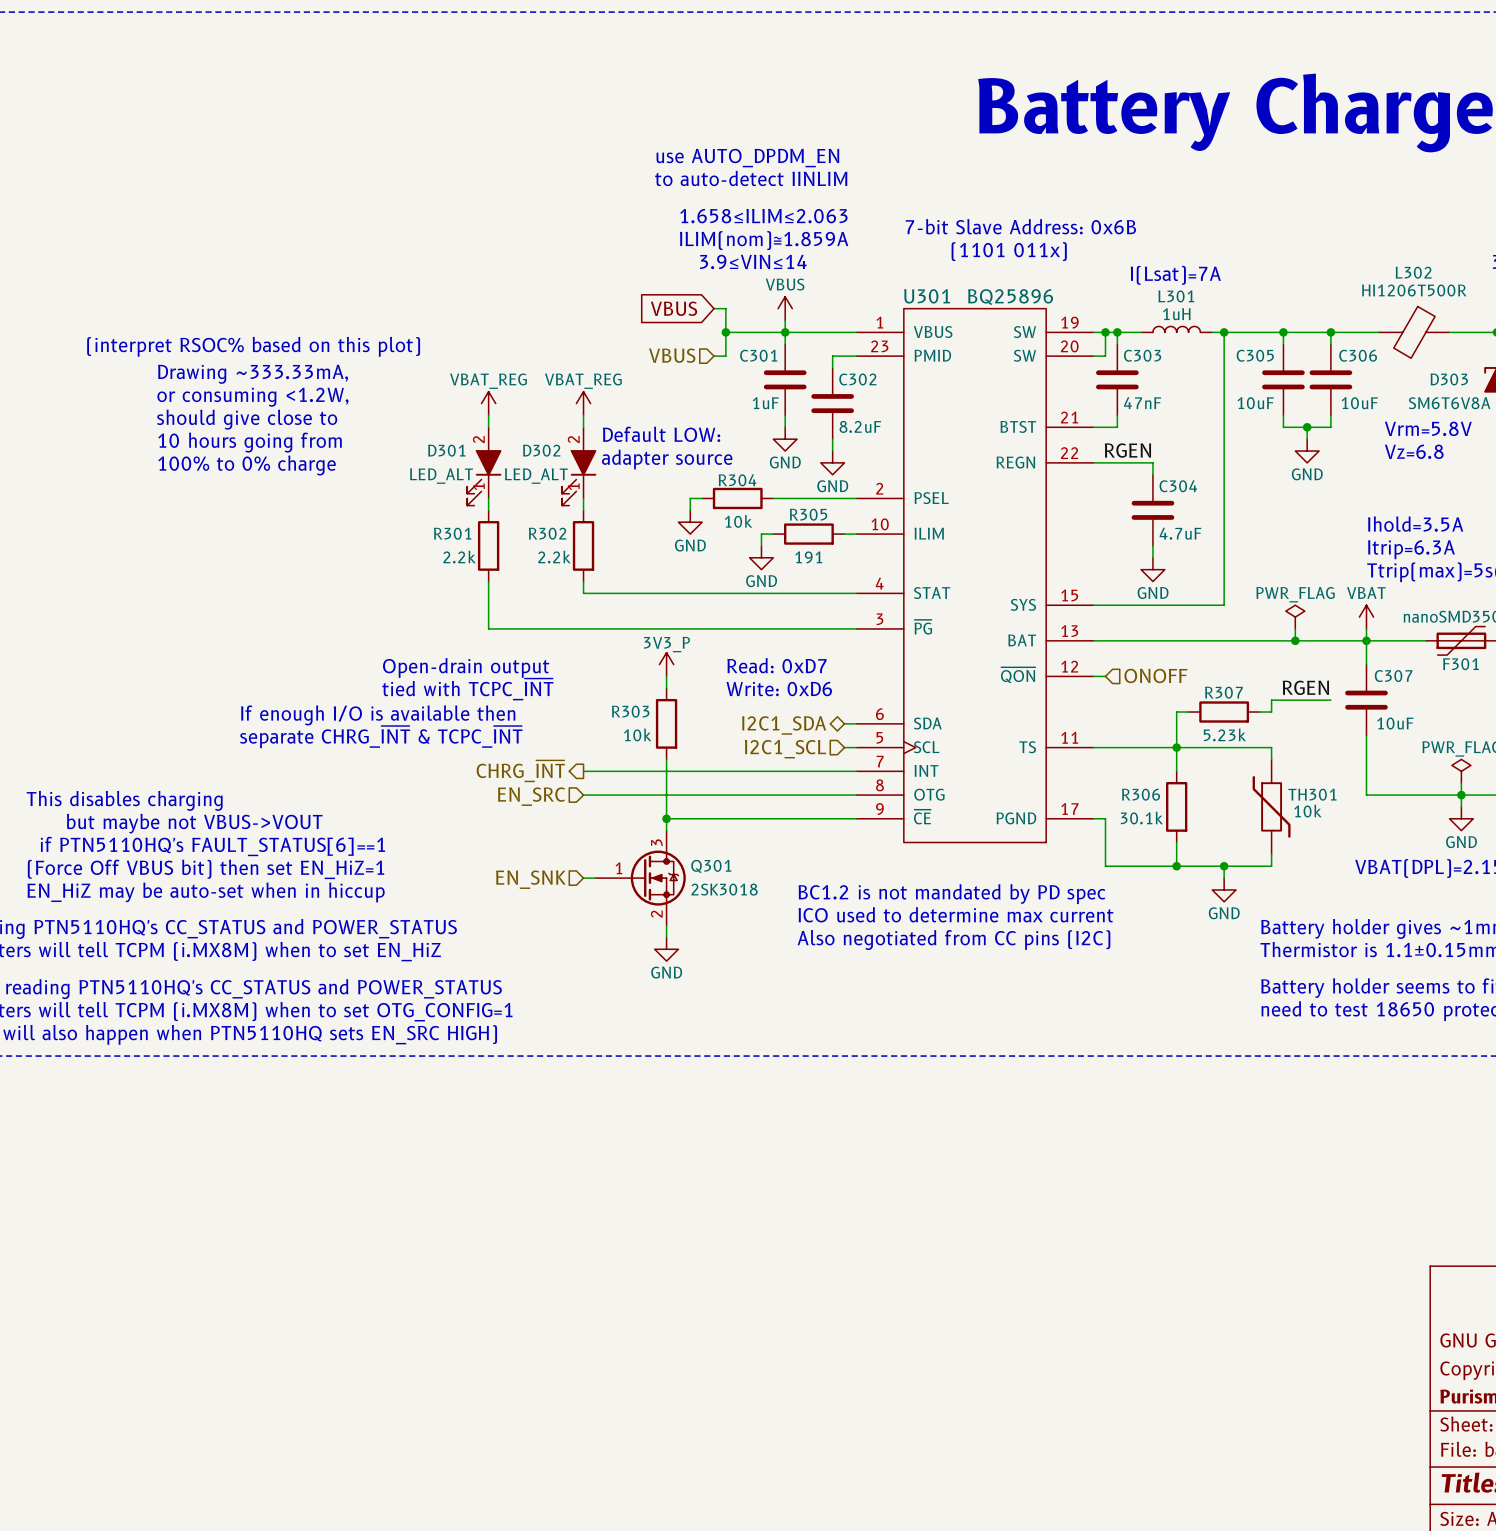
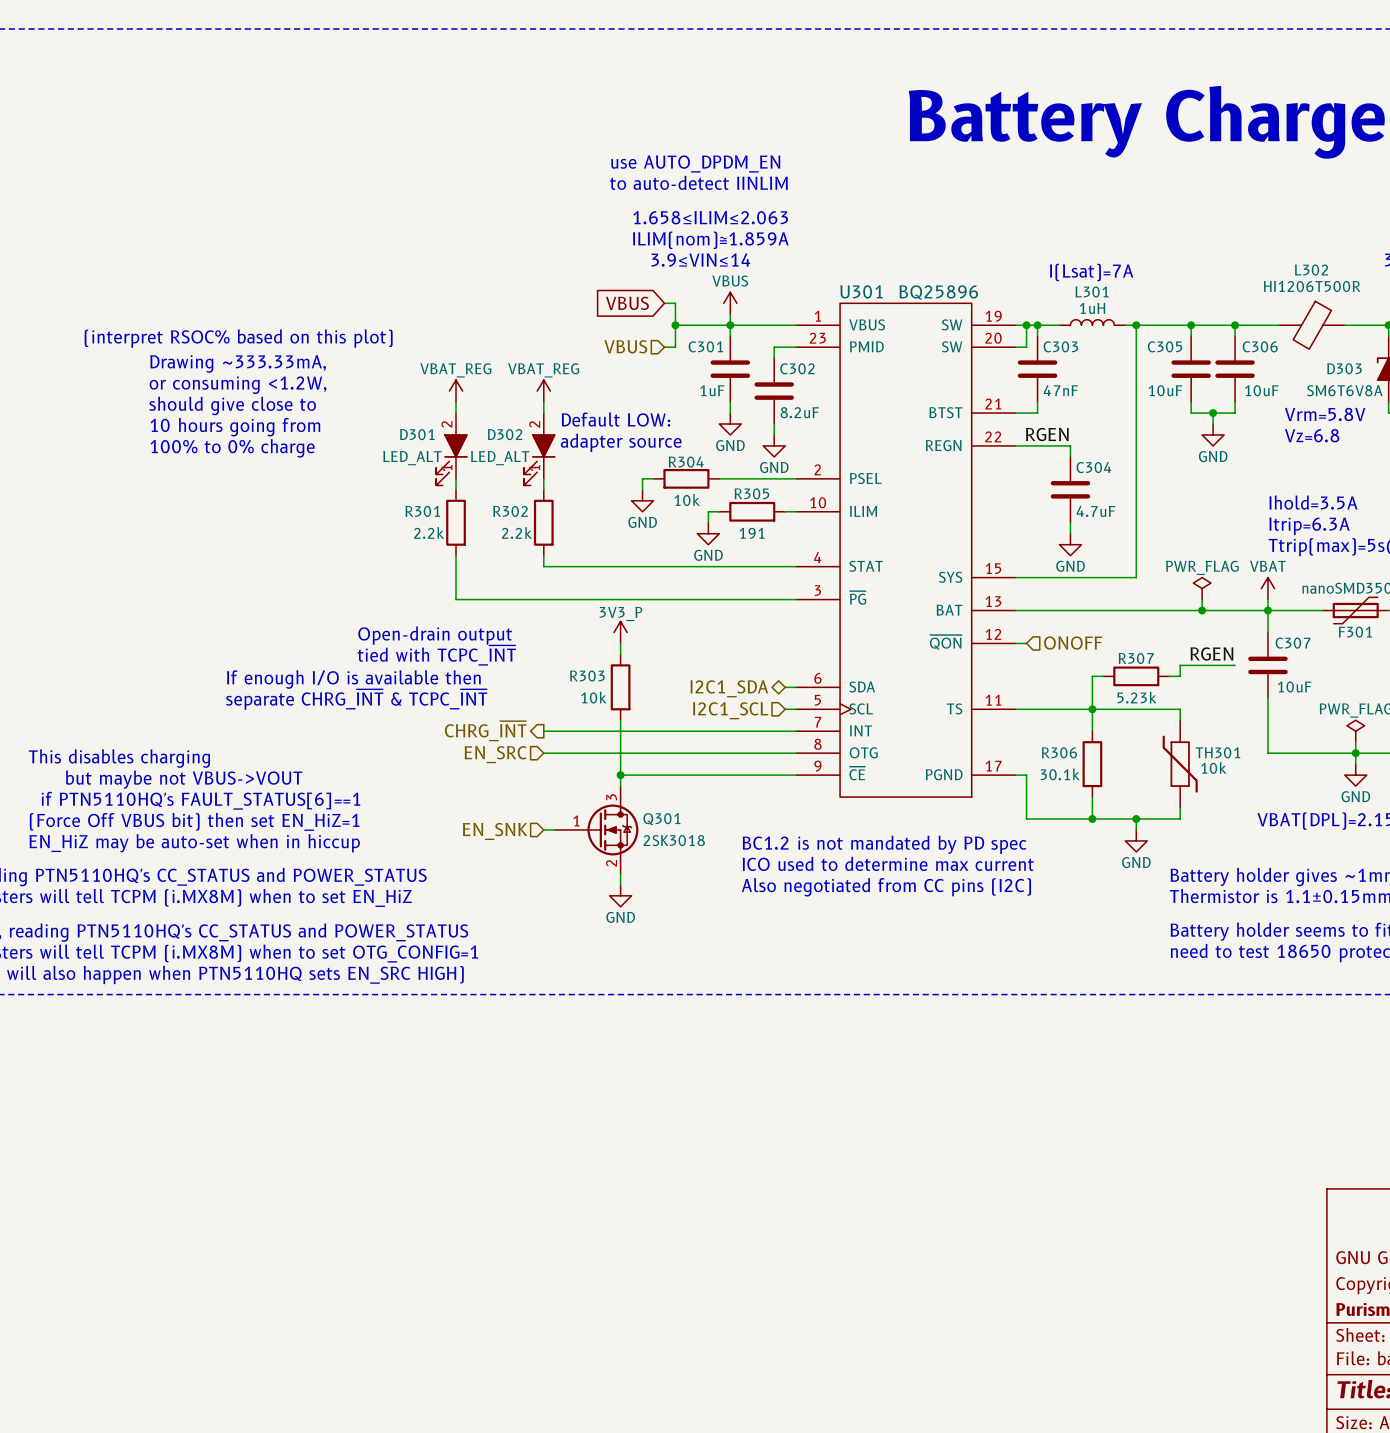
text: 7-bit Slave Address: 0x6B (1020, 226) -> none
text: (1101 011x) (1009, 251) -> none
text: Read: 0xD7 (776, 665) -> none
text: Write: 0xD6 (779, 689) -> none

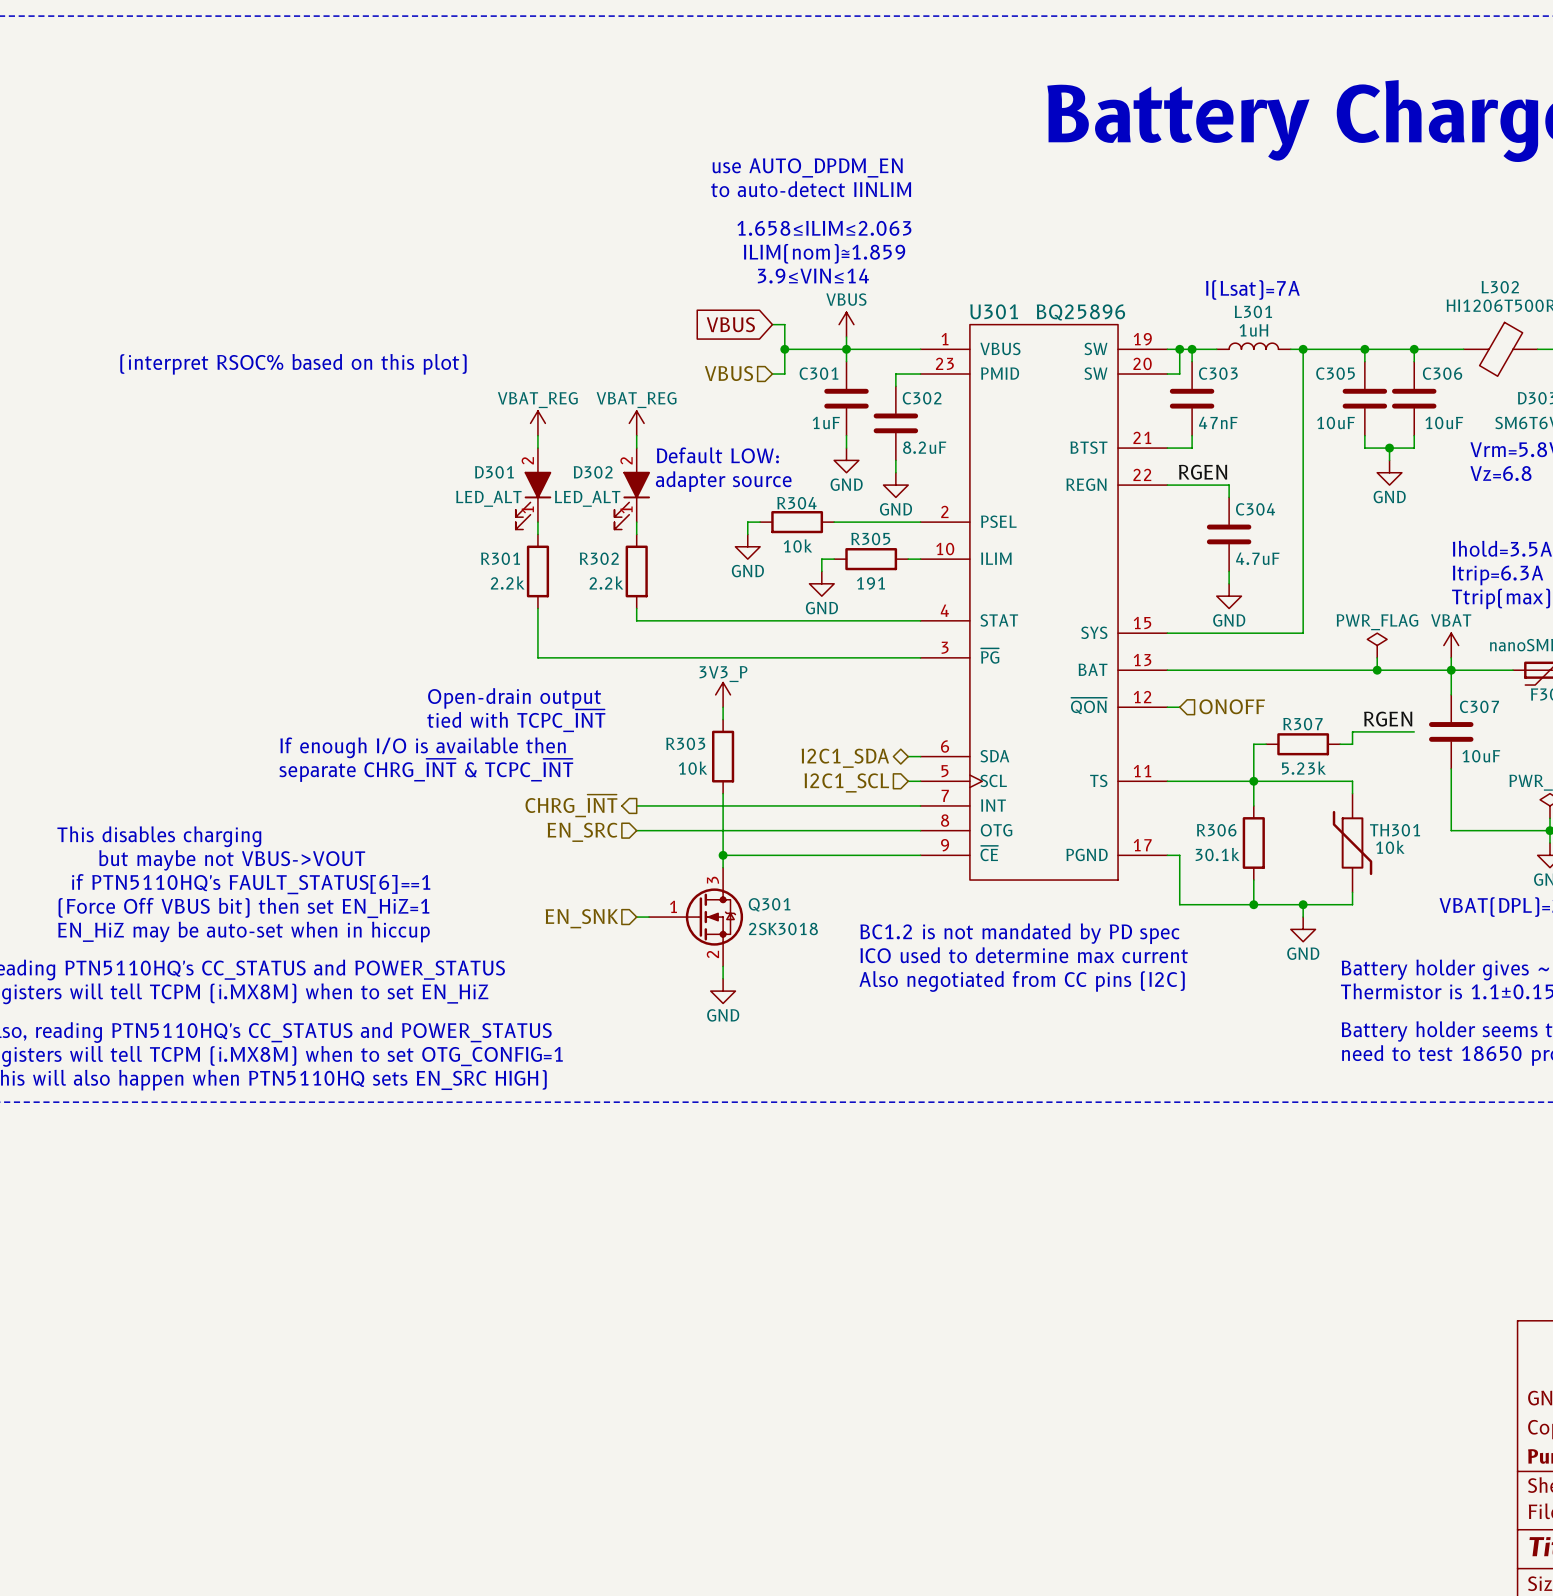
text: ILIM(nom)≅1.859A (710, 240) -> ILIM(nom)≅1.859 (824, 253)
text: Drawing ~333.33mA, (238, 364) -> none
text: or consuming <1.2W, (237, 385) -> none
text: should give close to (232, 405) -> none
text: 10 hours going from (235, 427) -> none
text: 100% to 0% charge (232, 448) -> none

